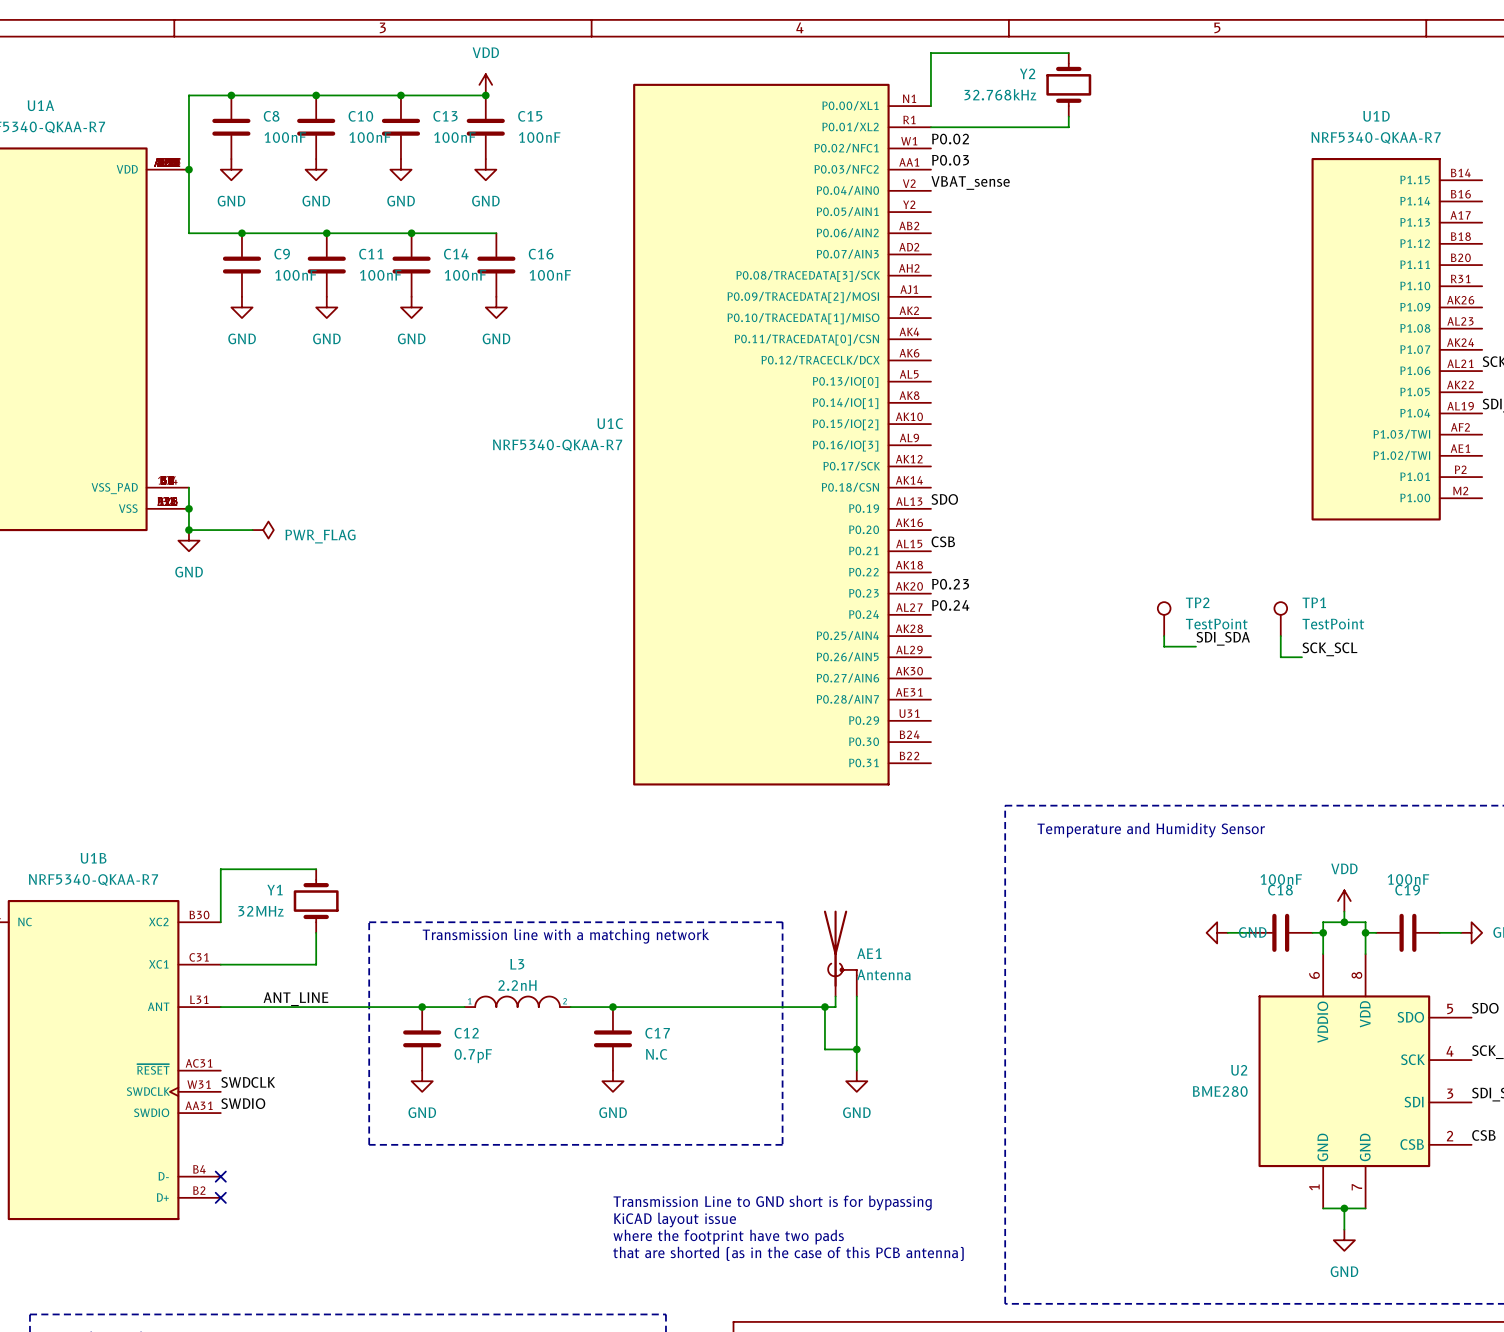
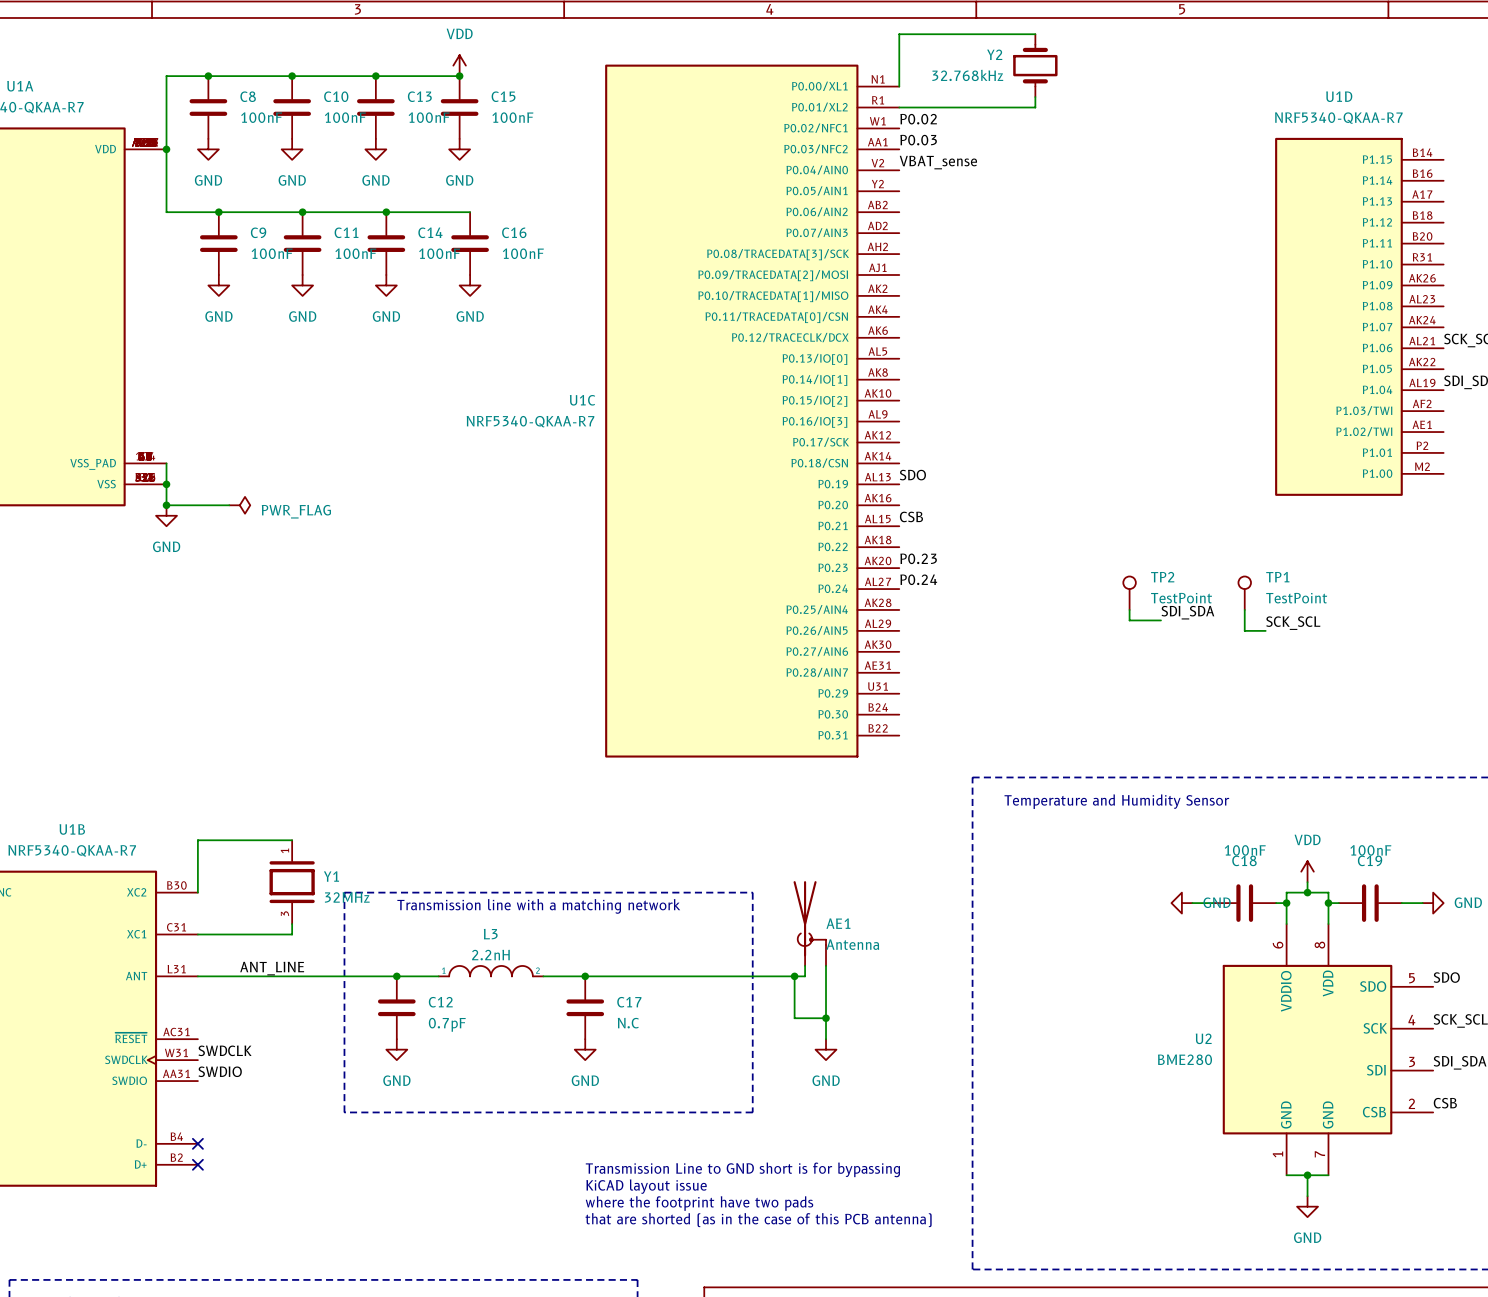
Y1 symbol: [293, 869, 339, 933] -> [269, 840, 315, 925]
Y1 name position: Y1 (274, 890) -> Y1 (331, 876)
Y1 value position: 32MHz (261, 911) -> 32MHz (347, 897)

